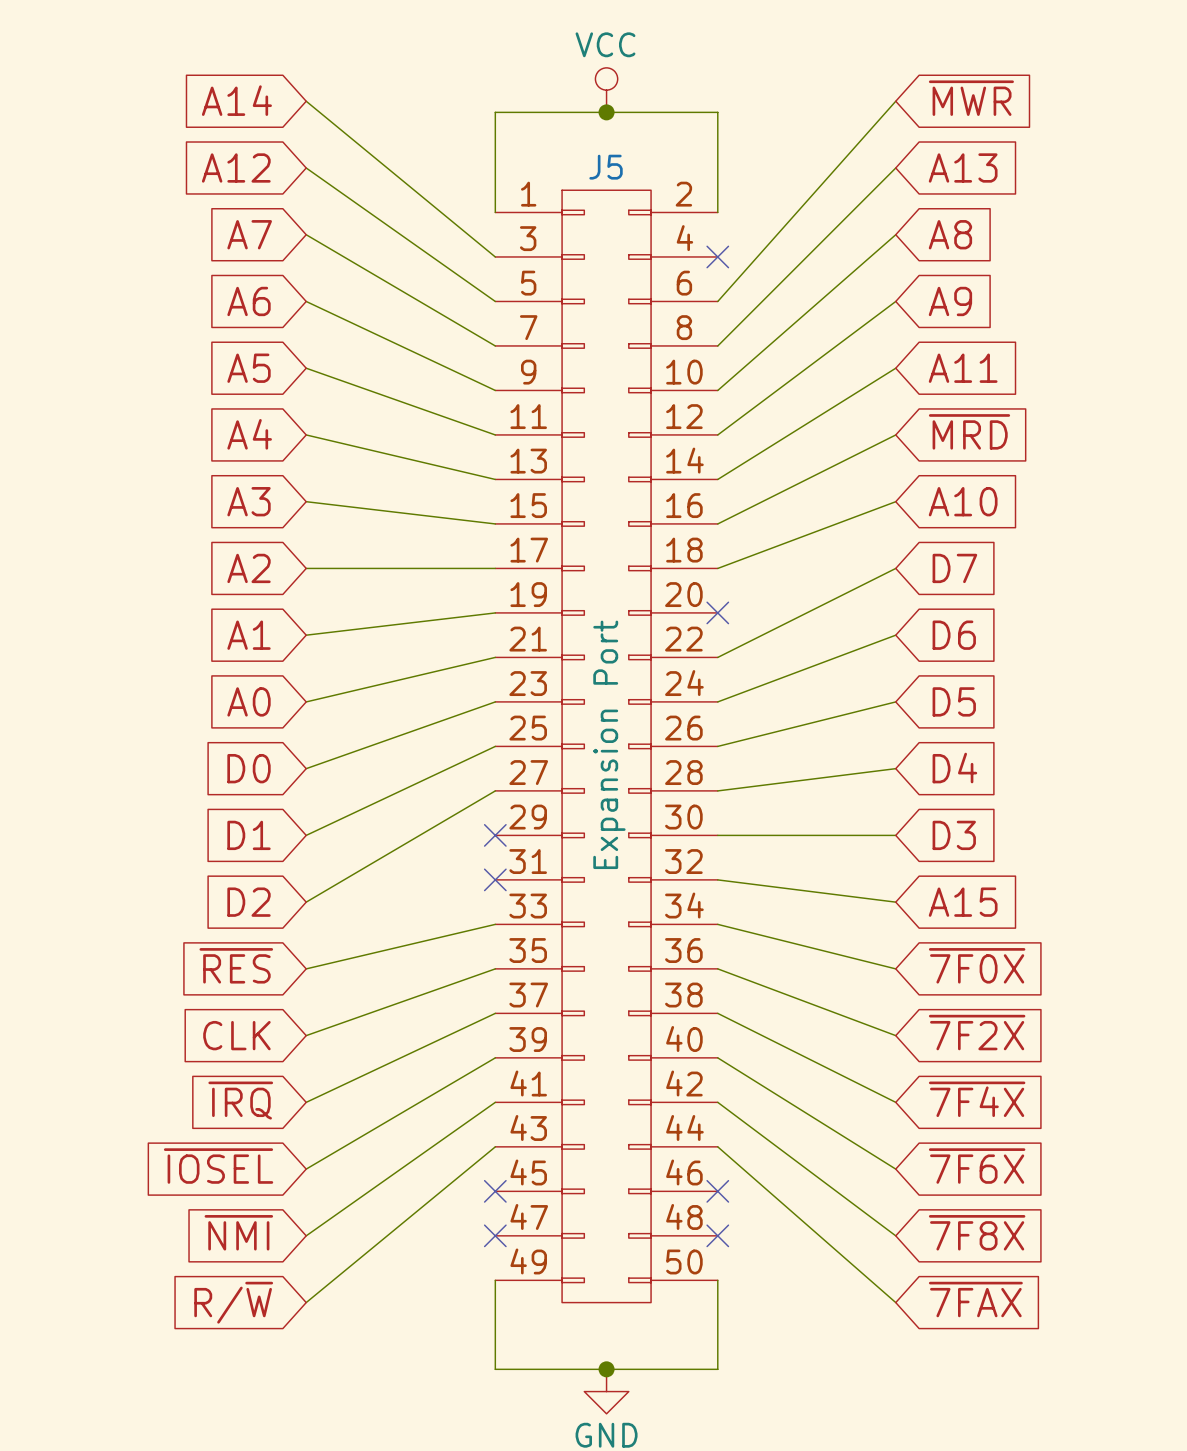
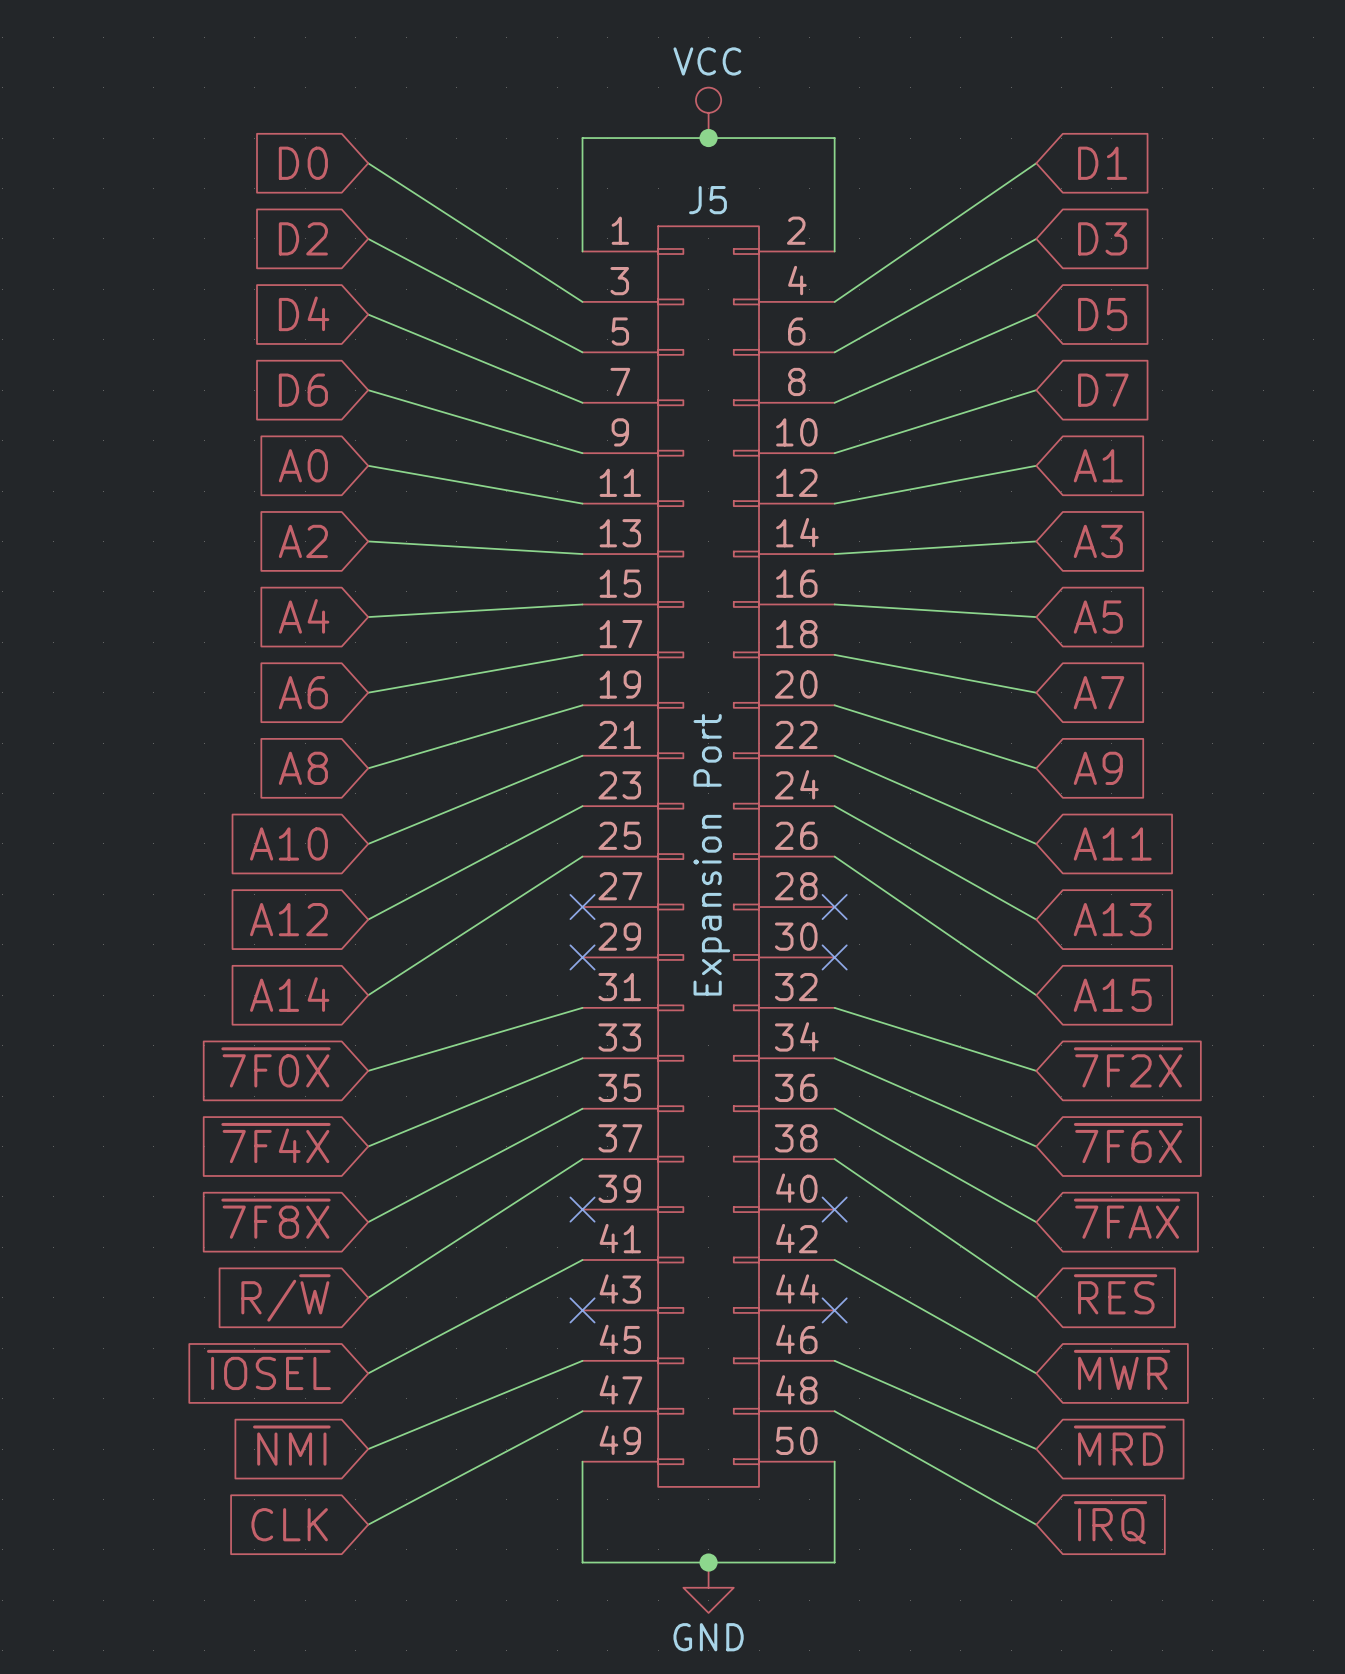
global label: ~{MWR} (971, 98) -> none
global label: A14 (236, 100) -> none
wire: (306, 101) (495, 256) -> (368, 163) (582, 301)
wire: (895, 101) (717, 301) -> (1036, 238) (834, 352)
global label: none -> D0 (303, 163)
wire: none -> (1036, 163) (834, 301)
global label: none -> D1 (1102, 163)
global label: A12 (236, 167) -> none
wire: (306, 167) (495, 301) -> (368, 238) (582, 352)
wire: (895, 167) (717, 345) -> (1036, 314) (834, 402)
global label: A13 (963, 167) -> none
global label: none -> D2 (303, 238)
global label: none -> D3 (1102, 238)
global label: A7 (249, 234) -> none
wire: (306, 234) (495, 345) -> (368, 314) (582, 402)
wire: (895, 234) (717, 390) -> (1036, 390) (834, 453)
global label: A8 (950, 234) -> none
no-connect mark: (717, 256) -> none
global label: none -> D4 (304, 313)
global label position: A6 (249, 301) -> A6 (303, 692)
wire: (306, 301) (495, 390) -> (368, 390) (582, 453)
wire: (895, 301) (717, 434) -> (1036, 465) (834, 503)
global label position: A9 (950, 301) -> A9 (1098, 768)
global label: none -> D6 (303, 390)
global label: A5 (249, 368) -> none
wire: (306, 368) (495, 434) -> (368, 465) (582, 503)
wire: (895, 368) (717, 479) -> (1036, 541) (834, 554)
global label position: A11 (963, 368) -> A11 (1112, 843)
global label: none -> A1 (1098, 465)
global label: ~{MRD} (969, 431) -> none
global label position: A4 (249, 434) -> A4 (304, 616)
wire: (306, 434) (495, 479) -> (368, 541) (582, 554)
wire: (895, 434) (717, 523) -> (1036, 617) (834, 604)
global label: none -> A3 (1098, 541)
global label: A3 (249, 501) -> none
wire: (306, 501) (495, 523) -> (368, 617) (582, 604)
wire: (895, 501) (717, 568) -> (1036, 692) (834, 654)
global label: A10 (963, 501) -> none
global label: none -> A5 (1098, 617)
global label position: A2 (249, 568) -> A2 (303, 541)
wire: (306, 568) (495, 568) -> (368, 692) (582, 654)
wire: (895, 568) (717, 657) -> (1036, 843) (834, 755)
global label position: D7 (954, 568) -> D7 (1103, 390)
global label: none -> A7 (1099, 692)
wire: (495, 612) (306, 635) -> (582, 705) (368, 768)
wire: none -> (834, 705) (1036, 768)
no-connect mark: (717, 612) -> none
global label: A1 (249, 635) -> none
wire: (895, 635) (717, 701) -> (1036, 919) (834, 806)
global label: D6 (954, 635) -> none
wire: (495, 657) (306, 701) -> (582, 755) (368, 843)
global label: none -> A8 (303, 768)
global label position: A0 (249, 701) -> A0 (303, 465)
wire: (495, 701) (306, 768) -> (582, 806) (368, 919)
wire: (895, 701) (717, 746) -> (1036, 995) (834, 856)
global label position: D5 (954, 701) -> D5 (1102, 314)
global label: none -> A10 (288, 843)
wire: (495, 746) (306, 835) -> (582, 856) (368, 995)
global label: D0 (249, 768) -> none
wire: (895, 768) (717, 790) -> none
global label: D4 (954, 768) -> none
wire: (495, 790) (306, 902) -> none
no-connect mark: none -> (582, 907)
no-connect mark: none -> (834, 907)
global label: none -> A12 (288, 919)
global label: none -> A13 (1112, 919)
global label: D1 (249, 835) -> none
wire: (717, 835) (895, 835) -> none
no-connect mark: none -> (834, 957)
global label: D3 (954, 835) -> none
global label: none -> A14 (289, 994)
wire: none -> (582, 1007) (368, 1070)
no-connect mark: (495, 879) -> none
wire: (717, 879) (895, 902) -> (834, 1007) (1036, 1070)
global label: D2 (249, 902) -> none
global label position: A15 (963, 902) -> A15 (1112, 995)
wire: (495, 924) (306, 968) -> (582, 1058) (368, 1146)
wire: (717, 924) (895, 968) -> (834, 1058) (1036, 1146)
global label: none -> ~{7F0X} (275, 1067)
global label: ~{RES} (236, 965) -> none
global label: ~{7F0X} (977, 965) -> none
wire: (495, 968) (306, 1035) -> (582, 1108) (368, 1222)
wire: (717, 968) (895, 1035) -> (834, 1108) (1036, 1222)
global label: none -> ~{7F4X} (275, 1143)
wire: (495, 1013) (306, 1102) -> (582, 1159) (368, 1297)
wire: (717, 1013) (895, 1102) -> (834, 1159) (1036, 1297)
global label position: ~{7F2X} (977, 1032) -> ~{7F2X} (1128, 1067)
global label position: CLK (236, 1035) -> CLK (289, 1524)
wire: (495, 1057) (306, 1169) -> none
no-connect mark: none -> (582, 1209)
wire: (717, 1057) (895, 1169) -> none
no-connect mark: none -> (834, 1209)
global label: none -> ~{7F8X} (275, 1218)
global label: ~{7F4X} (977, 1099) -> none
global label: ~{IRQ} (240, 1100) -> none
wire: (495, 1102) (306, 1235) -> (582, 1259) (368, 1373)
wire: (717, 1102) (895, 1235) -> (834, 1259) (1036, 1373)
global label: none -> ~{RES} (1115, 1294)
wire: (495, 1146) (306, 1302) -> none
no-connect mark: none -> (582, 1310)
wire: (717, 1146) (895, 1302) -> none
no-connect mark: none -> (834, 1310)
global label position: ~{IOSEL} (218, 1166) -> ~{IOSEL} (268, 1369)
global label position: ~{7F6X} (977, 1166) -> ~{7F6X} (1128, 1143)
wire: none -> (582, 1360) (368, 1449)
no-connect mark: (495, 1191) -> none
wire: none -> (834, 1360) (1036, 1449)
no-connect mark: (717, 1191) -> none
global label: none -> ~{MWR} (1122, 1369)
global label position: ~{NMI} (238, 1232) -> ~{NMI} (291, 1445)
global label: ~{7F8X} (977, 1232) -> none
wire: none -> (582, 1411) (368, 1524)
no-connect mark: (495, 1235) -> none
wire: none -> (834, 1411) (1036, 1524)
no-connect mark: (717, 1235) -> none
global label: none -> ~{MRD} (1119, 1445)
global label position: ~{7FAX} (975, 1299) -> ~{7FAX} (1127, 1218)
global label position: R/~{W} (233, 1302) -> R/~{W} (286, 1297)
global label: none -> ~{IRQ} (1110, 1522)

